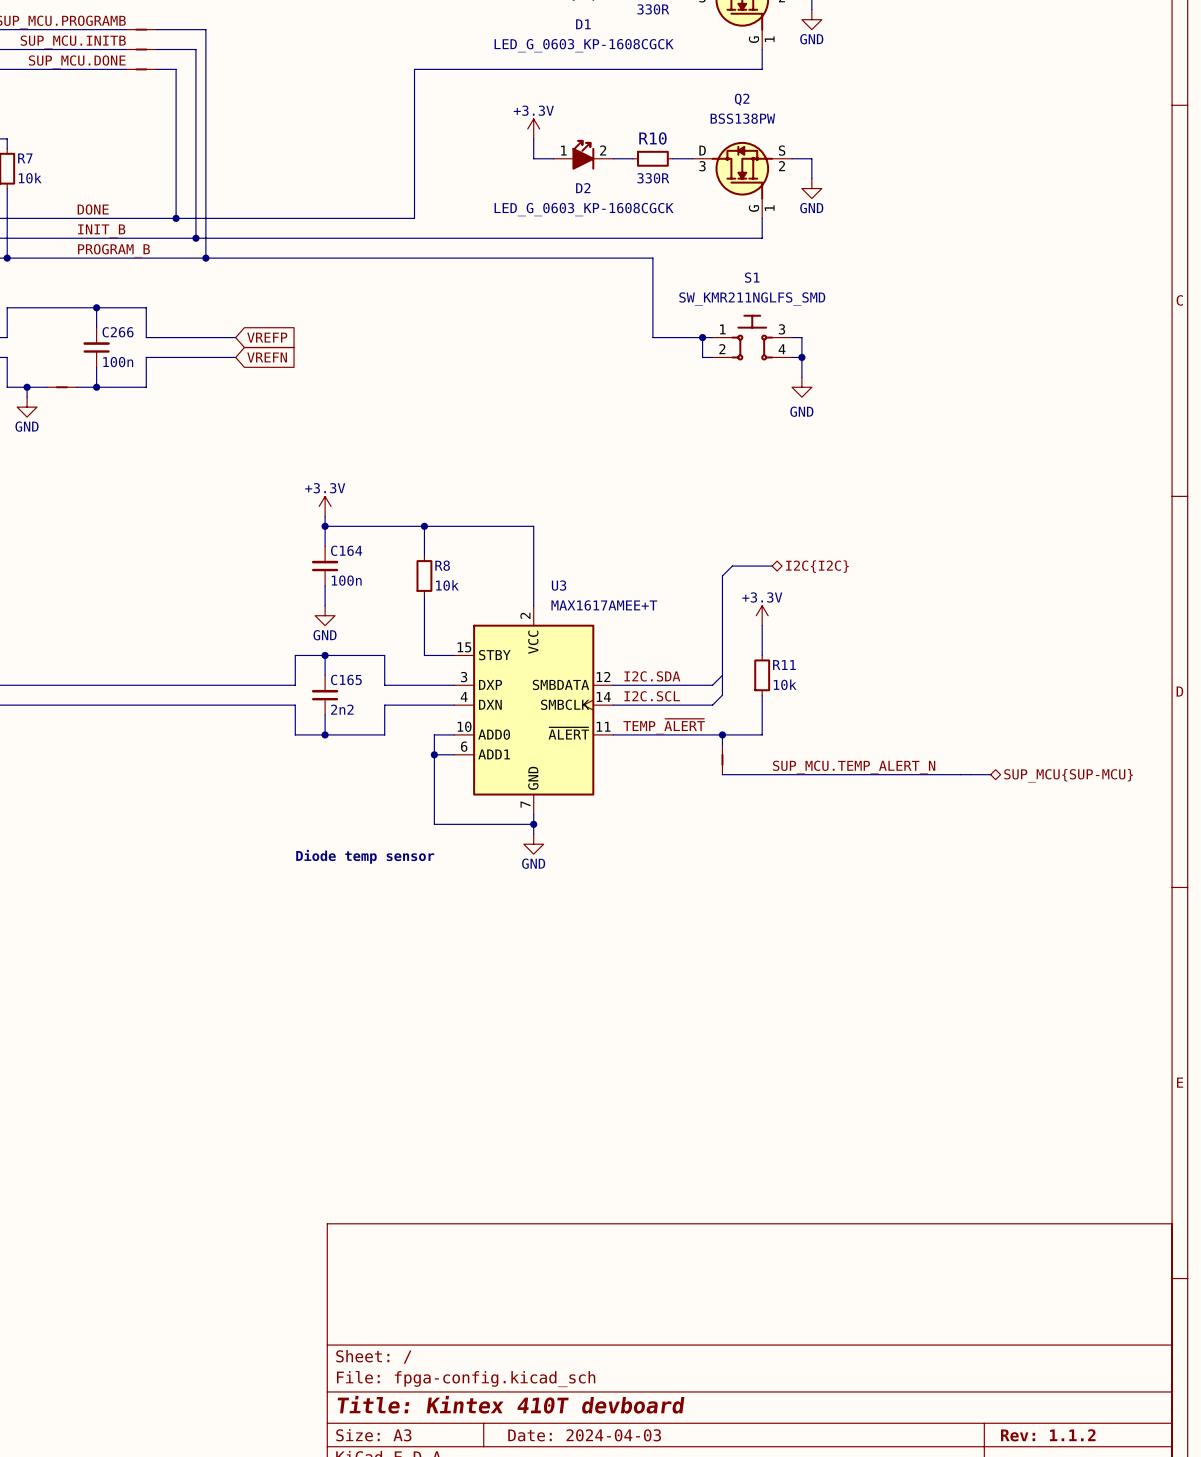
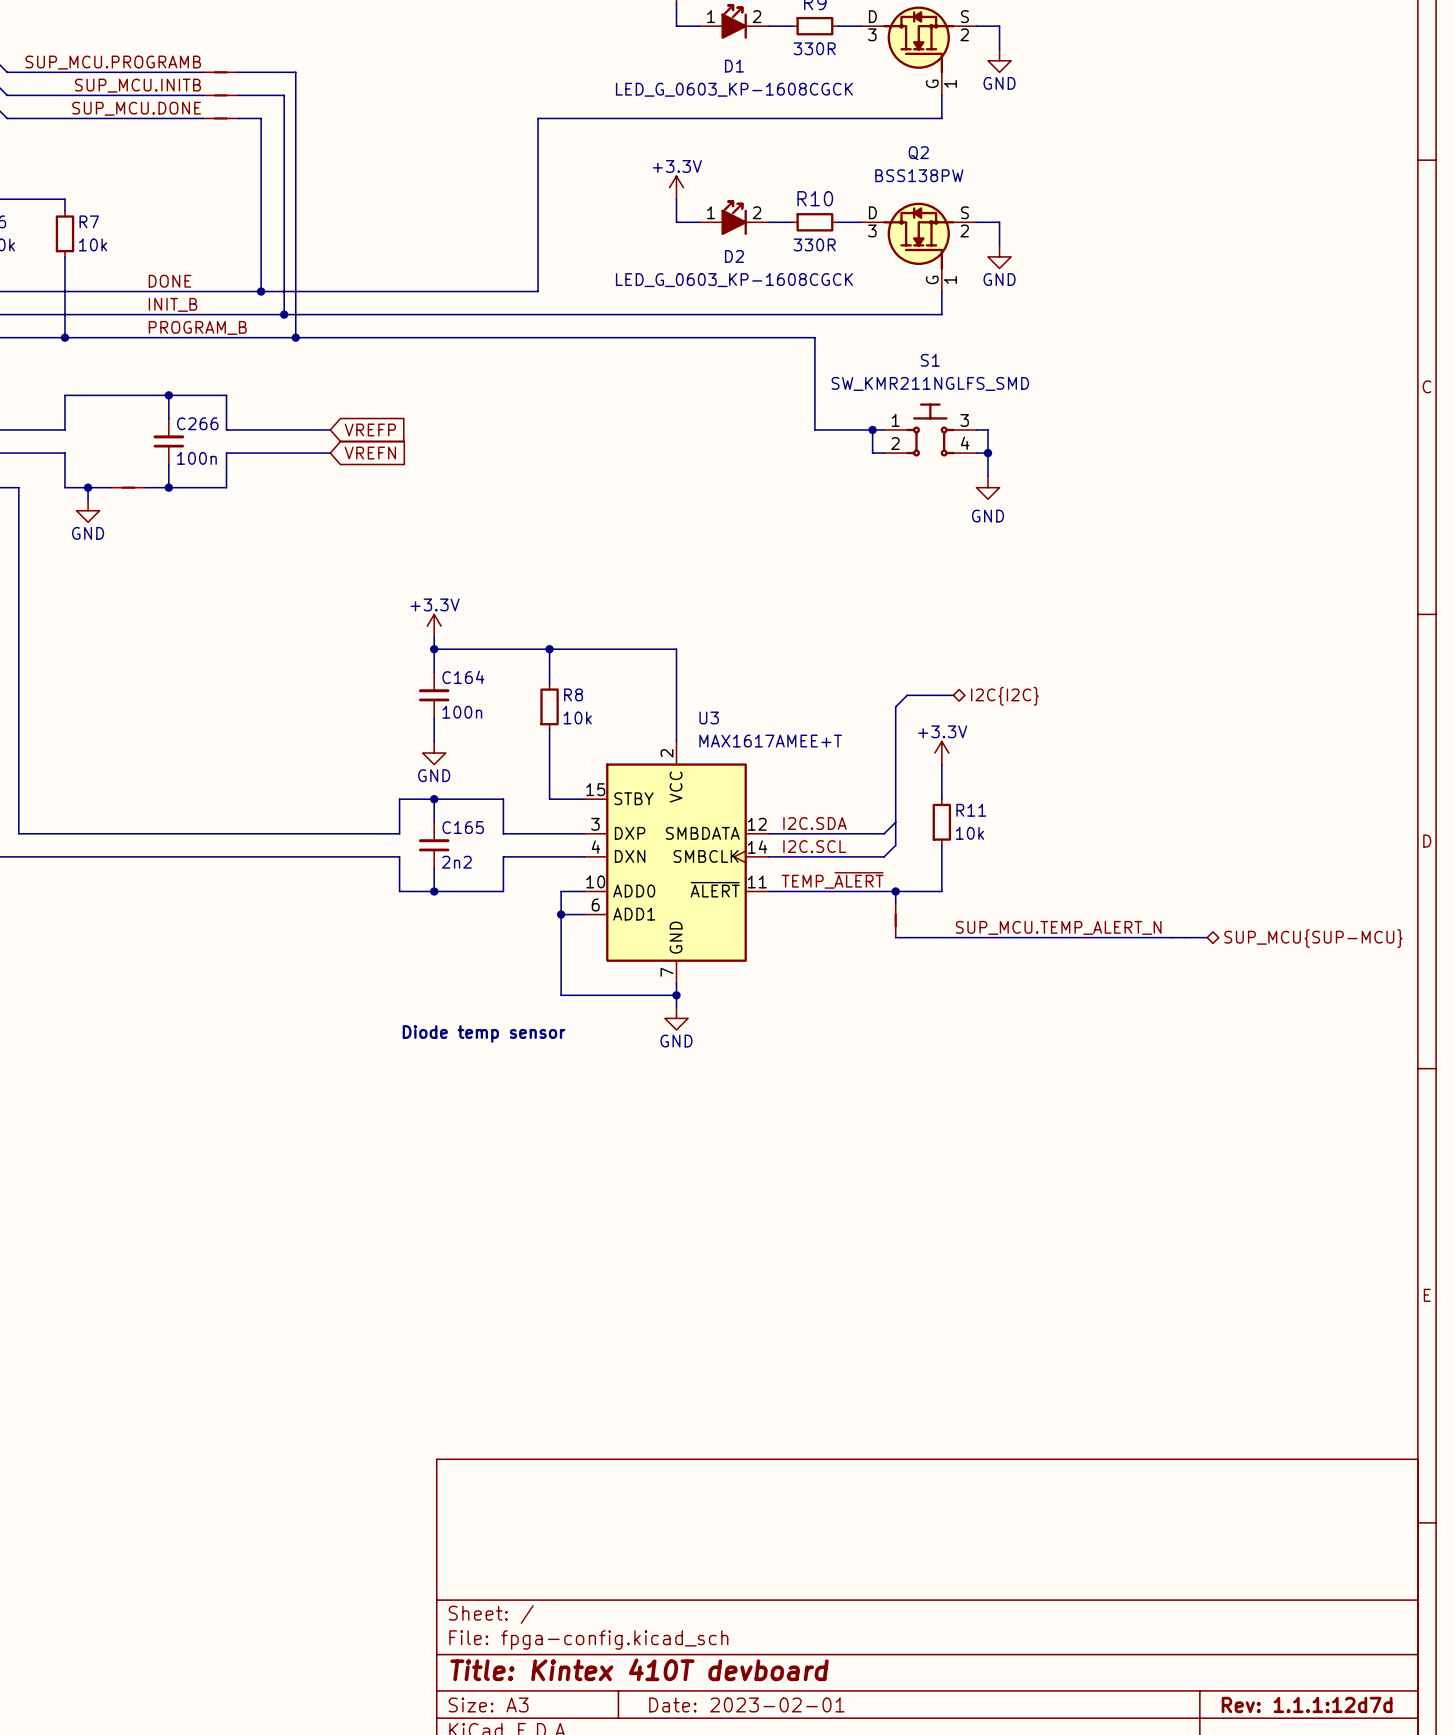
title block: Date: 2024-04-03 (584, 1435) -> Date: 2023-02-01 (746, 1704)
title block: Rev: 1.1.2 (1048, 1435) -> Rev: 1.1.1:12d7d (1307, 1704)

